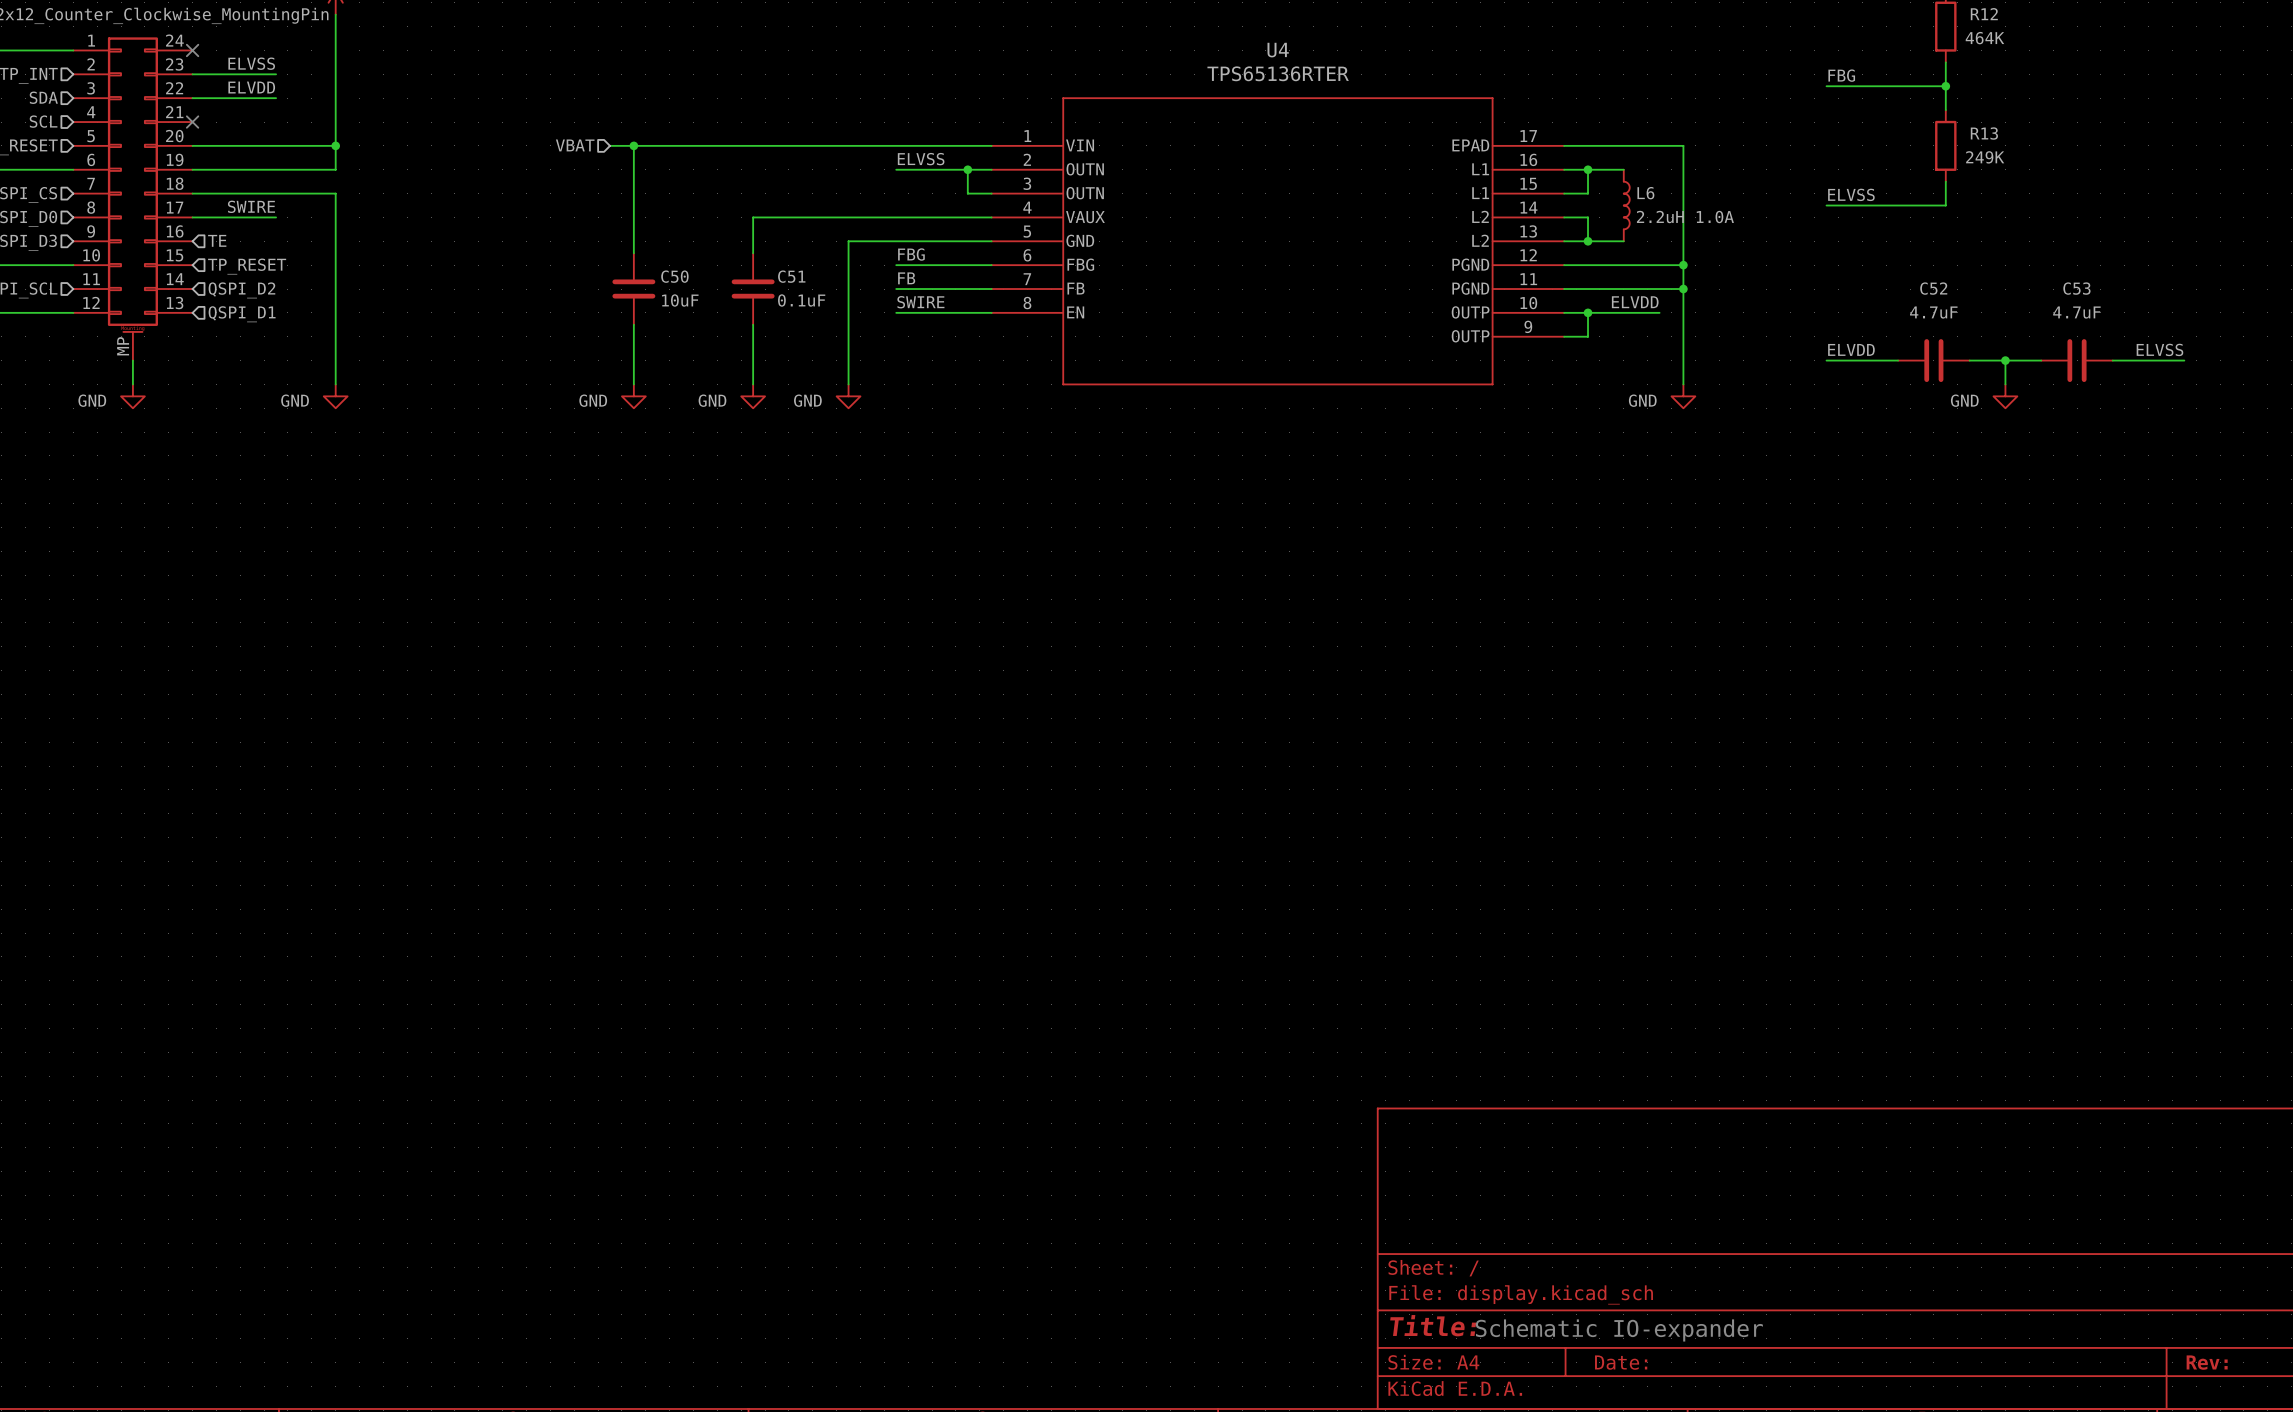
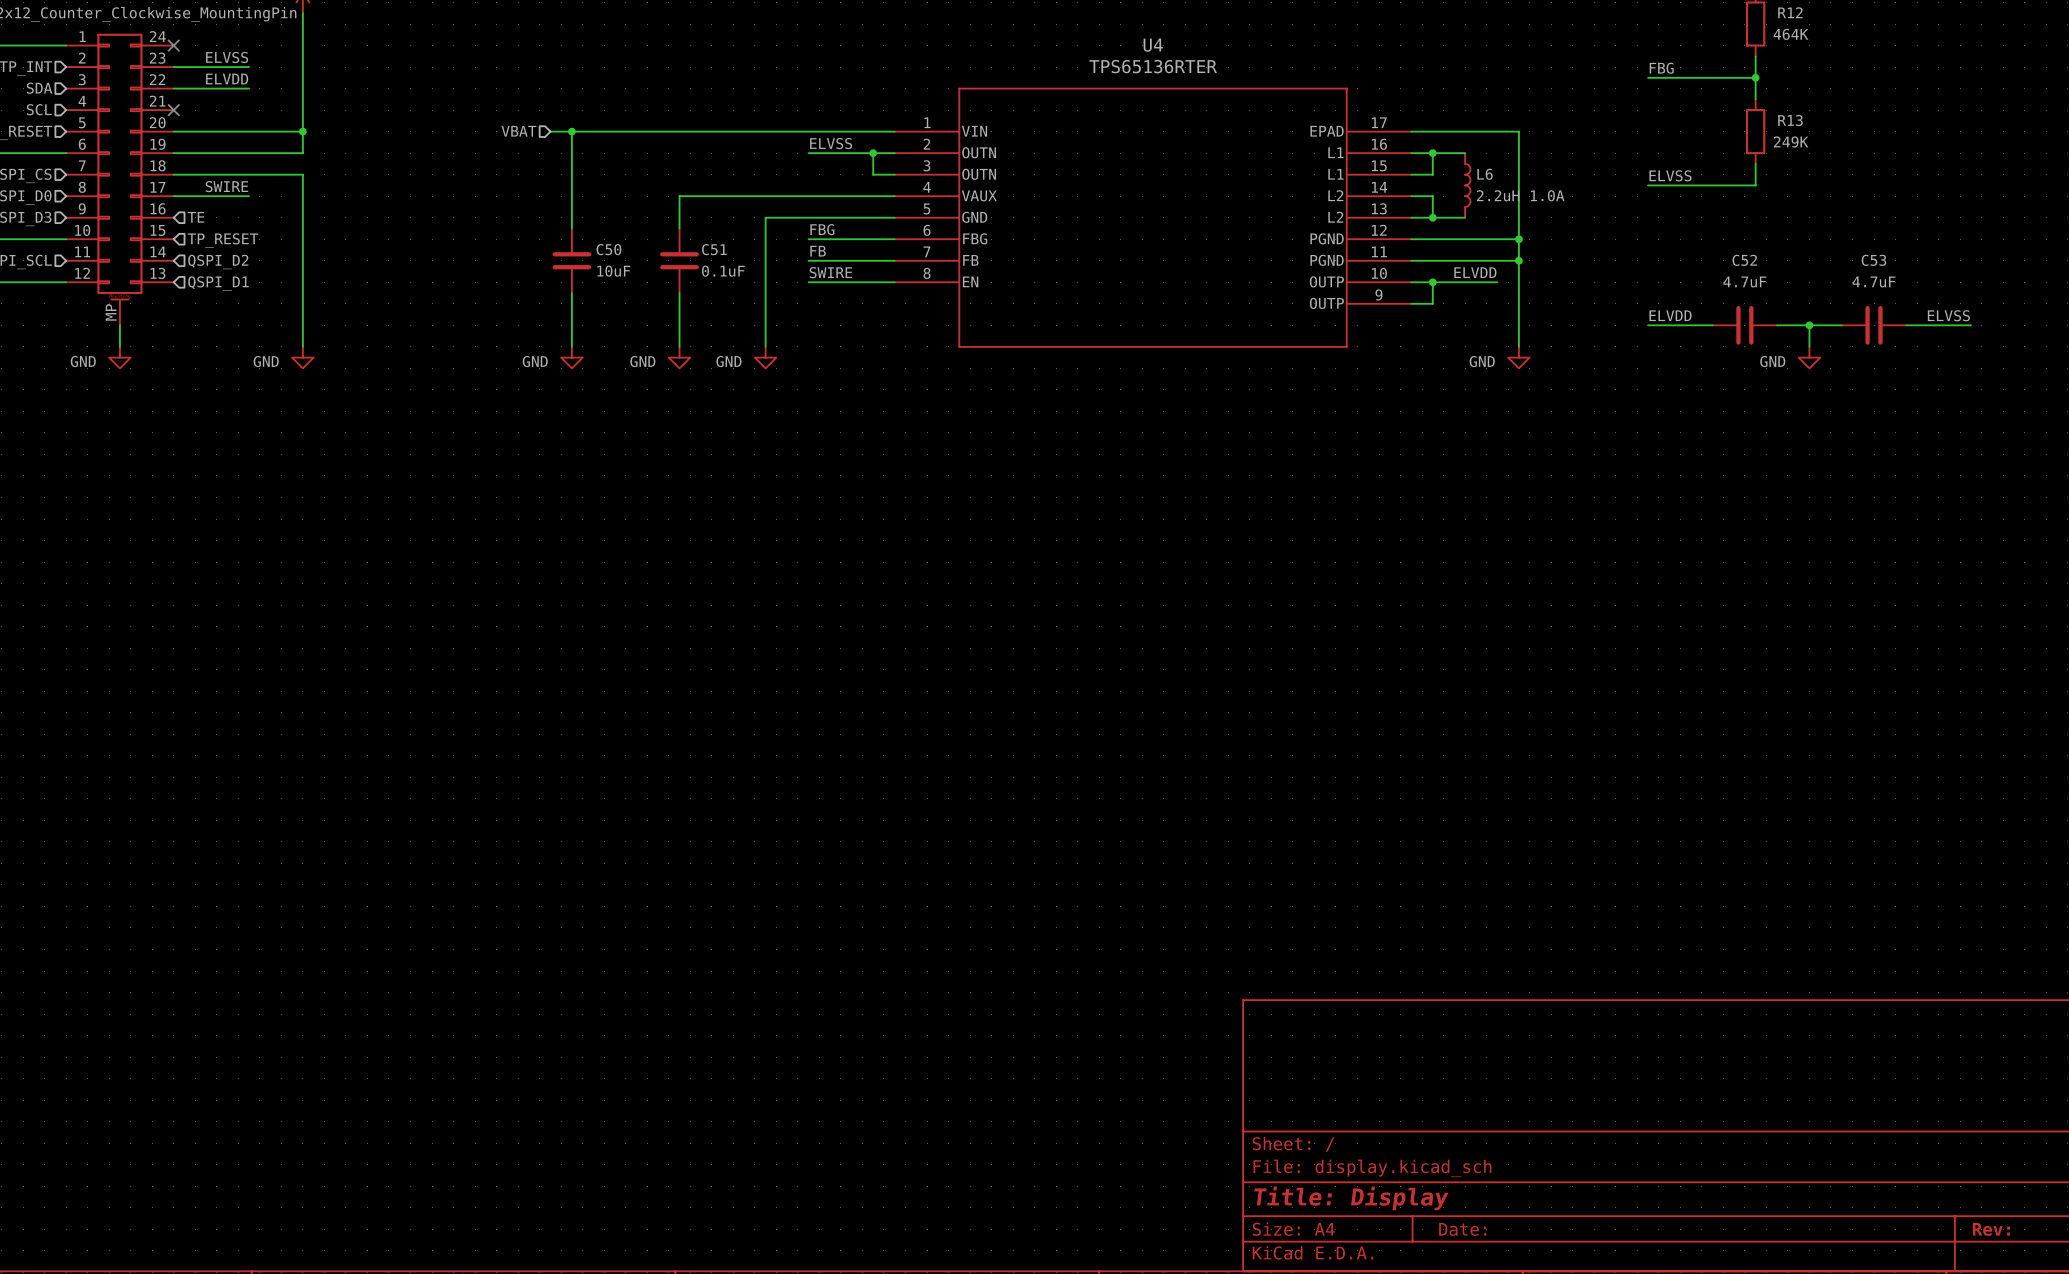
title block: Title: (1433, 1325) -> Title: Display (1351, 1198)
text: Schematic IO-expander (1619, 1330) -> none

